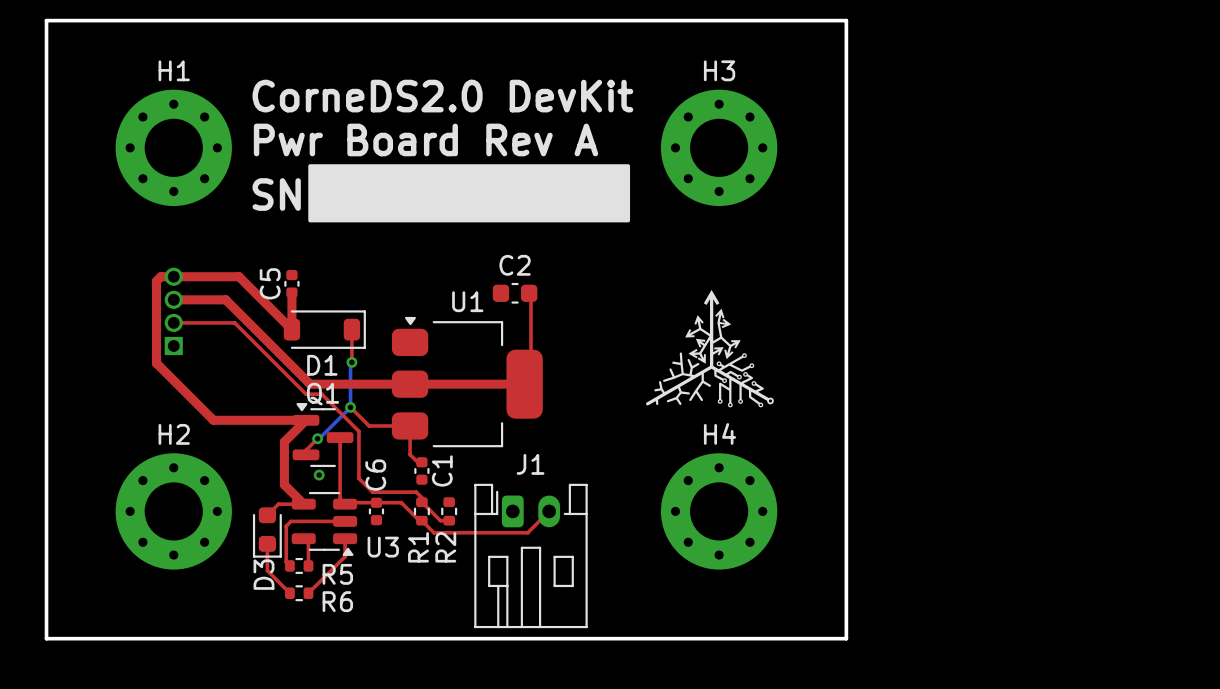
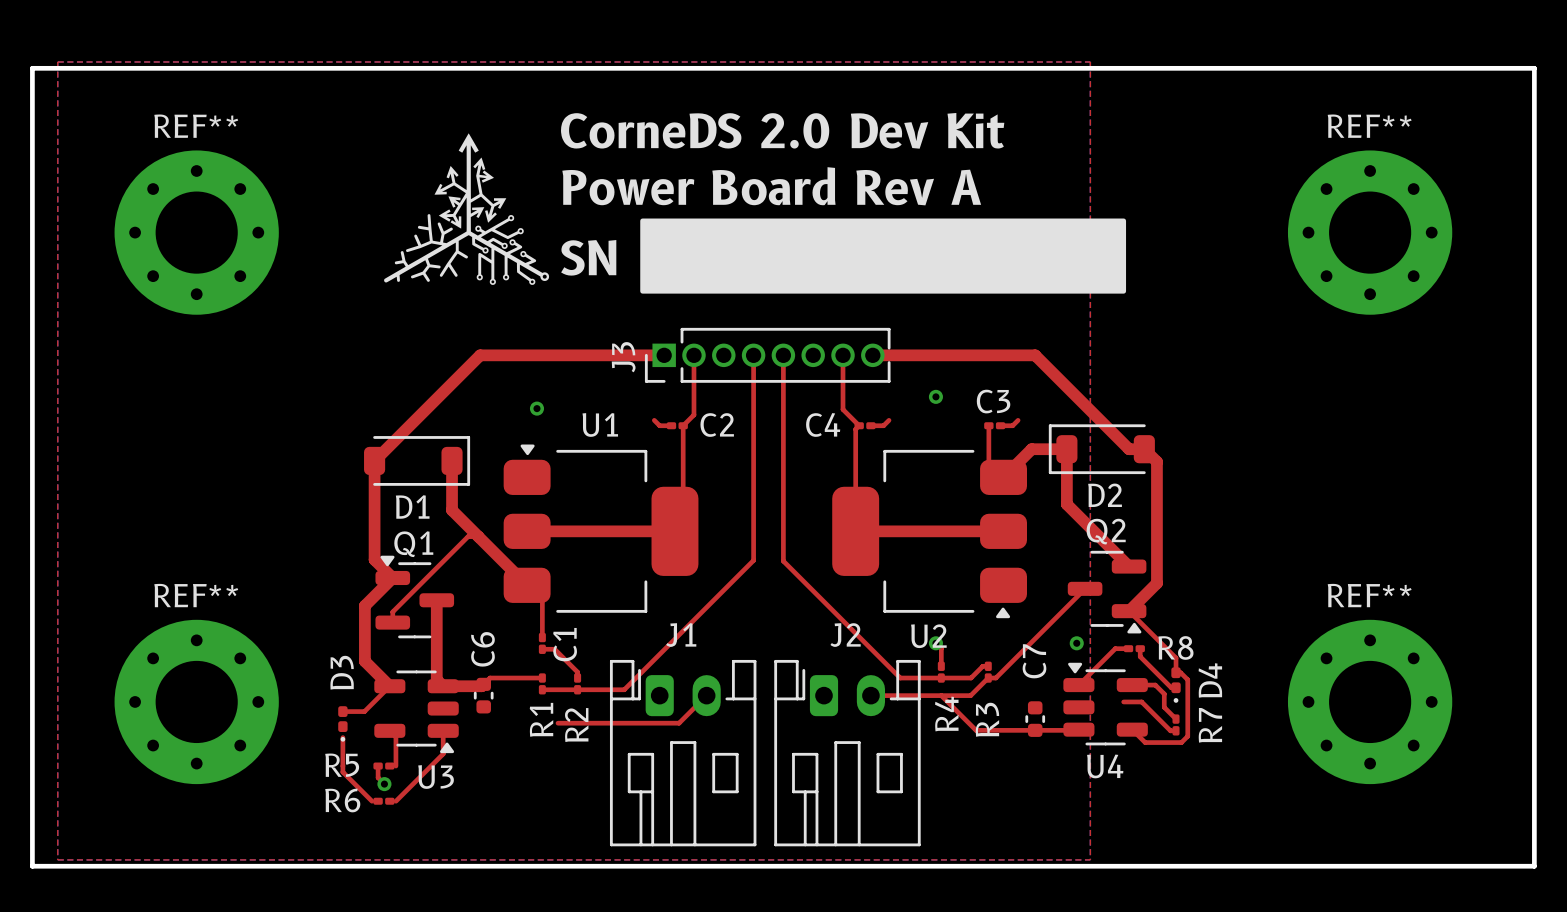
board edge: (46, 20) (846, 20) (846, 638) (46, 638) (46, 20) -> (32, 68) (32, 866) (1534, 866) (1534, 68) (32, 68)
text: CorneDS2.0 DevKit (442, 96) -> CorneDS 2.0 Dev Kit (782, 130)
text: Pwr Board Rev A (426, 139) -> Power Board Rev A (771, 186)
drawing: none -> [640, 218, 1127, 294]
H1: (173, 147) -> none
H3: (719, 147) -> none
REF**: none -> (196, 232)
REF**: none -> (1370, 232)
drawing: [308, 164, 631, 223] -> none
text position: SN (276, 194) -> SN (588, 257)
top track: none -> (693, 355) (693, 414) (683, 425)
top track: none -> (753, 355) (753, 560) (624, 689) (542, 689)
J3: none -> (767, 355)
top track: none -> (783, 355) (783, 561) (900, 678) (971, 678) (982, 666) (988, 666)
top track: none -> (843, 355) (843, 409) (859, 425) (855, 429) (855, 531) (1003, 531)
top track: none -> (872, 355) (1035, 355) (1129, 449) (1144, 449) (1156, 461) (1156, 583) (1129, 611) (1176, 658) (1176, 672) (1180, 672) (1187, 679) (1187, 736) (1181, 742) (1145, 742) (1132, 729)
C2 name position: C2 (515, 265) -> C2 (717, 425)
via: none -> (935, 396)
C2 footprint: [492, 282, 538, 304] -> [666, 422, 688, 430]
C5: (291, 283) -> none
via: none -> (536, 408)
top track: (291, 292) (291, 329) (239, 276) (160, 276) (156, 281) (156, 363) (213, 420) (306, 420) -> (664, 355) (480, 355) (374, 460) (374, 559) (392, 577)
top track: none -> (654, 420) (659, 425) (671, 425)
top track: none -> (889, 420) (883, 425) (870, 425)
top track: none -> (1018, 420) (1012, 425) (1000, 425)
top track: (173, 299) (225, 299) (310, 384) (410, 384) -> none
C4: none -> (865, 425)
top track: none -> (988, 425) (988, 462) (1003, 477) (1031, 449) (1066, 449) (1066, 504) (1129, 566)
C3: none -> (994, 425)
part: (173, 311) -> none
D2: none -> (1101, 449)
top track: (173, 322) (234, 322) (305, 394) (321, 394) (358, 431) (358, 478) (372, 492) (416, 492) (421, 497) (421, 502) (440, 520) (449, 520) -> none
top track width: thin (351, 329) (351, 362) -> thick (452, 460) (452, 503)
drawing position: (709, 348) -> (466, 209)
top track: none -> (452, 503) (452, 510) (542, 600) (542, 637)
bottom track: (351, 362) (350, 407) (317, 438) -> none
via: (351, 362) -> none
U2: none -> (929, 534)
top track: (350, 407) (369, 425) (410, 425) (410, 454) (417, 462) (421, 462) -> none
via: (350, 407) -> none
top track: none -> (1085, 588) (995, 678) (988, 678) (970, 695) (870, 695)
Q2: none -> (1107, 592)
top track width: thin (340, 437) (340, 499) (345, 504) -> thick (436, 600) (436, 679) (443, 686)
top track: (317, 438) (306, 450) -> (478, 536) (468, 536) (392, 611) (392, 616)
via: (317, 438) -> none
C1 footprint: [414, 457, 430, 485] -> [538, 632, 546, 654]
top track: none -> (935, 643) (941, 648) (941, 666)
via: none -> (935, 643)
via: none -> (1076, 643)
via: (319, 475) -> none
top track: none -> (542, 649) (554, 649) (577, 672) (577, 678)
top track: none -> (1128, 648) (1115, 648) (1078, 685)
R8: none -> (1134, 648)
top track: none -> (1140, 648) (1140, 656) (1171, 687) (1176, 687)
R4: none -> (941, 672)
R3: none -> (988, 672)
R1 footprint: [413, 497, 430, 526] -> [538, 673, 546, 695]
R2 footprint: [441, 497, 458, 526] -> [574, 673, 582, 695]
top track: none -> (1132, 685) (1155, 685) (1164, 694) (1164, 707) (1176, 719)
D4: none -> (1176, 685)
top track: (303, 504) (278, 504) (267, 515) -> (389, 686) (364, 711) (342, 711)
top track: (345, 504) (401, 502) (433, 532) -> (443, 686) (481, 686) (490, 678) (542, 678)
D3 footprint: [252, 507, 282, 558] -> [338, 706, 348, 742]
H2: (173, 511) -> none
H4: (719, 511) -> none
top track: none -> (941, 695) (976, 730) (1078, 729)
REF**: none -> (196, 701)
top track: none -> (1123, 701) (1141, 701) (1170, 730) (1176, 730) (1176, 728)
REF**: none -> (1370, 701)
U4: none -> (1105, 704)
top track: (345, 521) (291, 521) (286, 526) (286, 562) (289, 565) -> none
C7: none -> (1035, 719)
R7: none -> (1176, 724)
U3 name position: U3 (383, 547) -> U3 (436, 777)
J2: none -> (847, 753)
R5 footprint: [285, 557, 314, 574] -> [373, 762, 395, 770]
top track: none -> (378, 766) (378, 777) (384, 784)
D3 name position: D3 (263, 574) -> D3 (342, 672)
R5 name position: R5 (337, 574) -> R5 (342, 765)
via: none -> (384, 784)
R6 footprint: [285, 585, 314, 602] -> [373, 797, 395, 805]
R6 name position: R6 (337, 601) -> R6 (342, 800)

